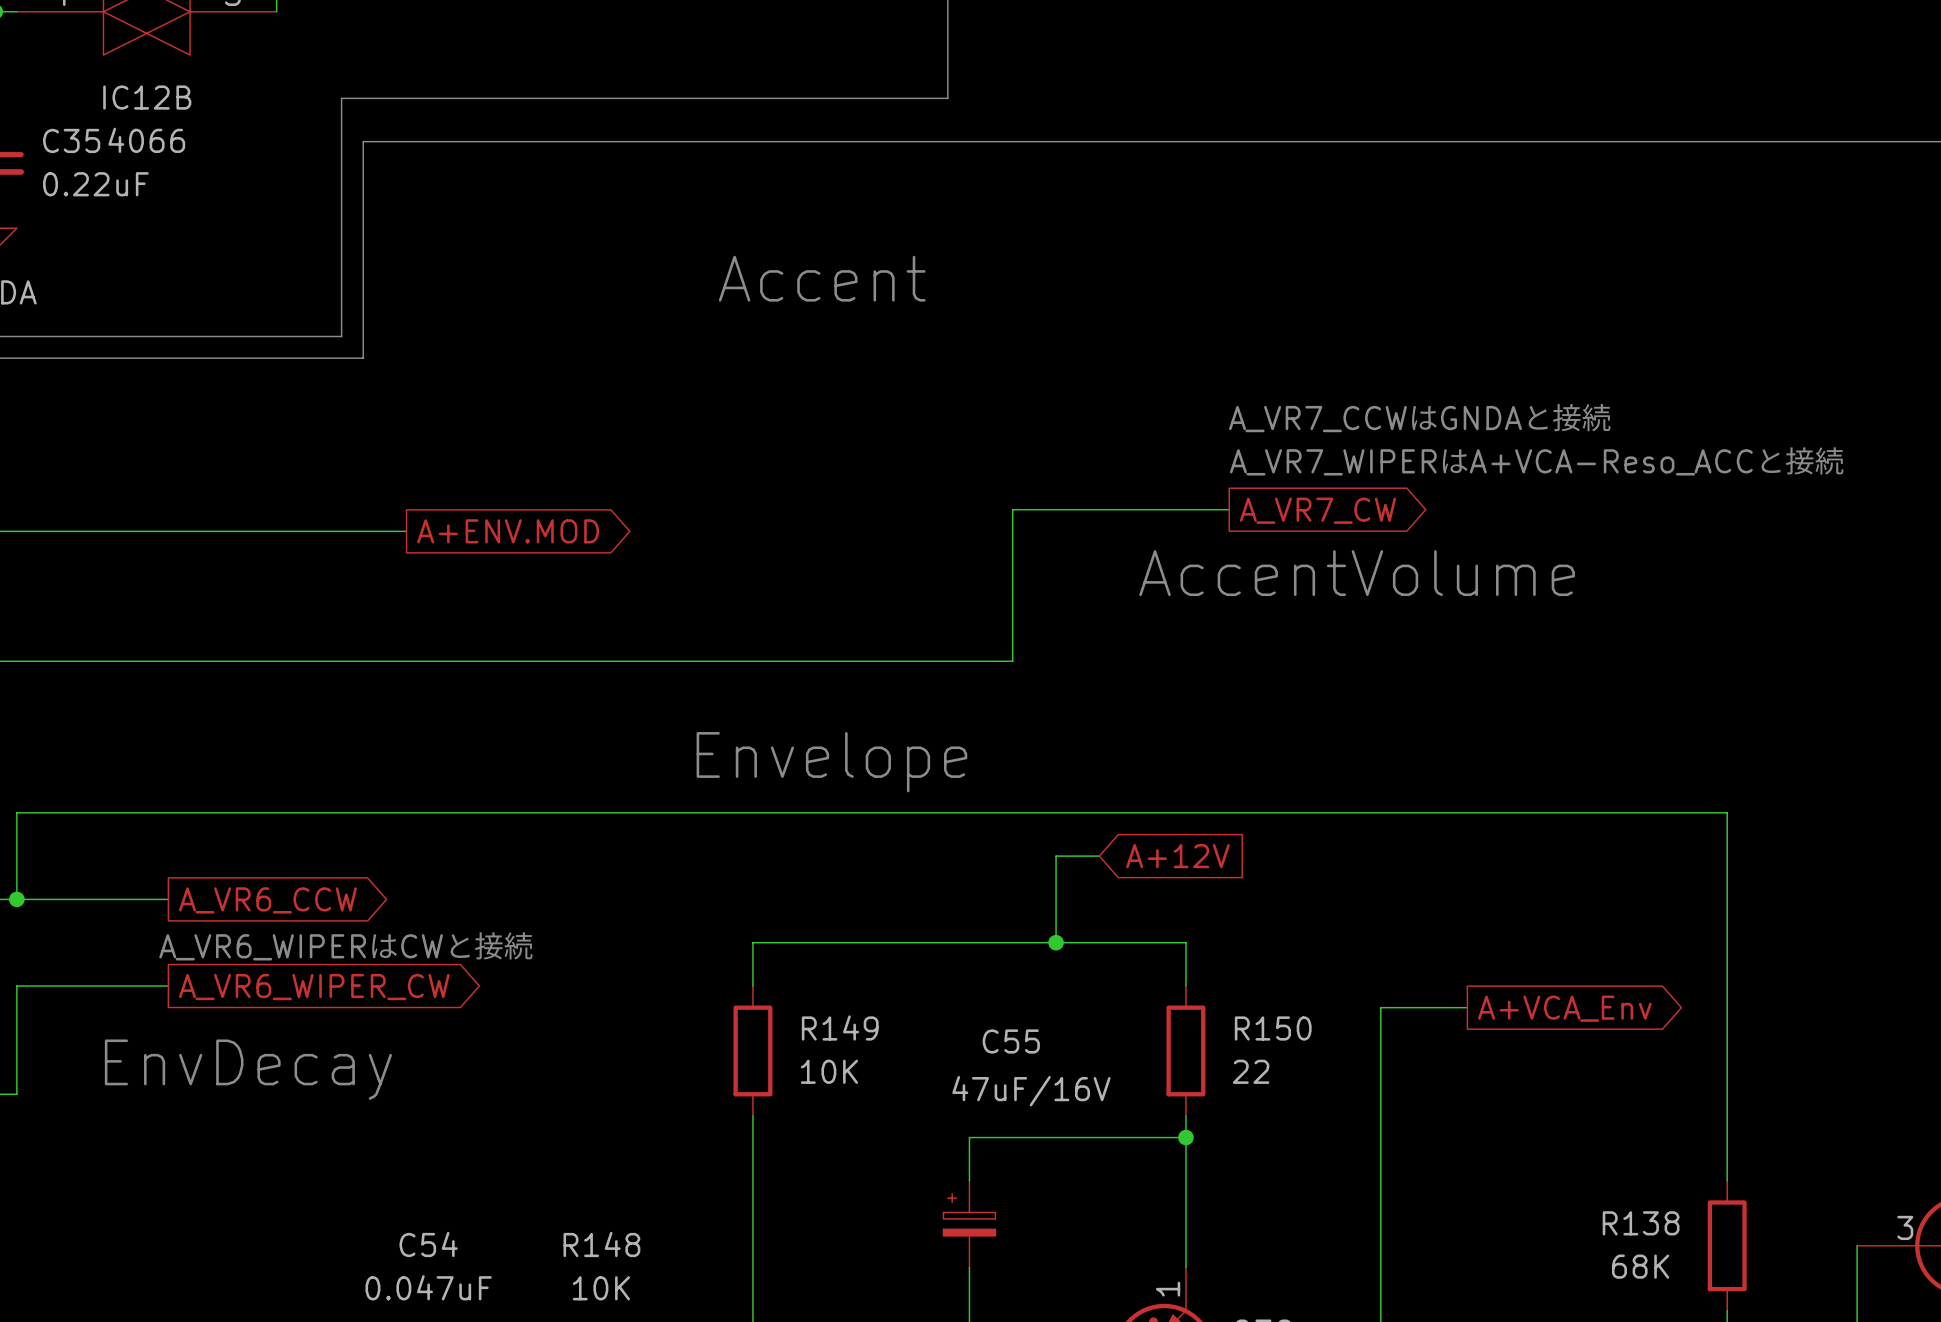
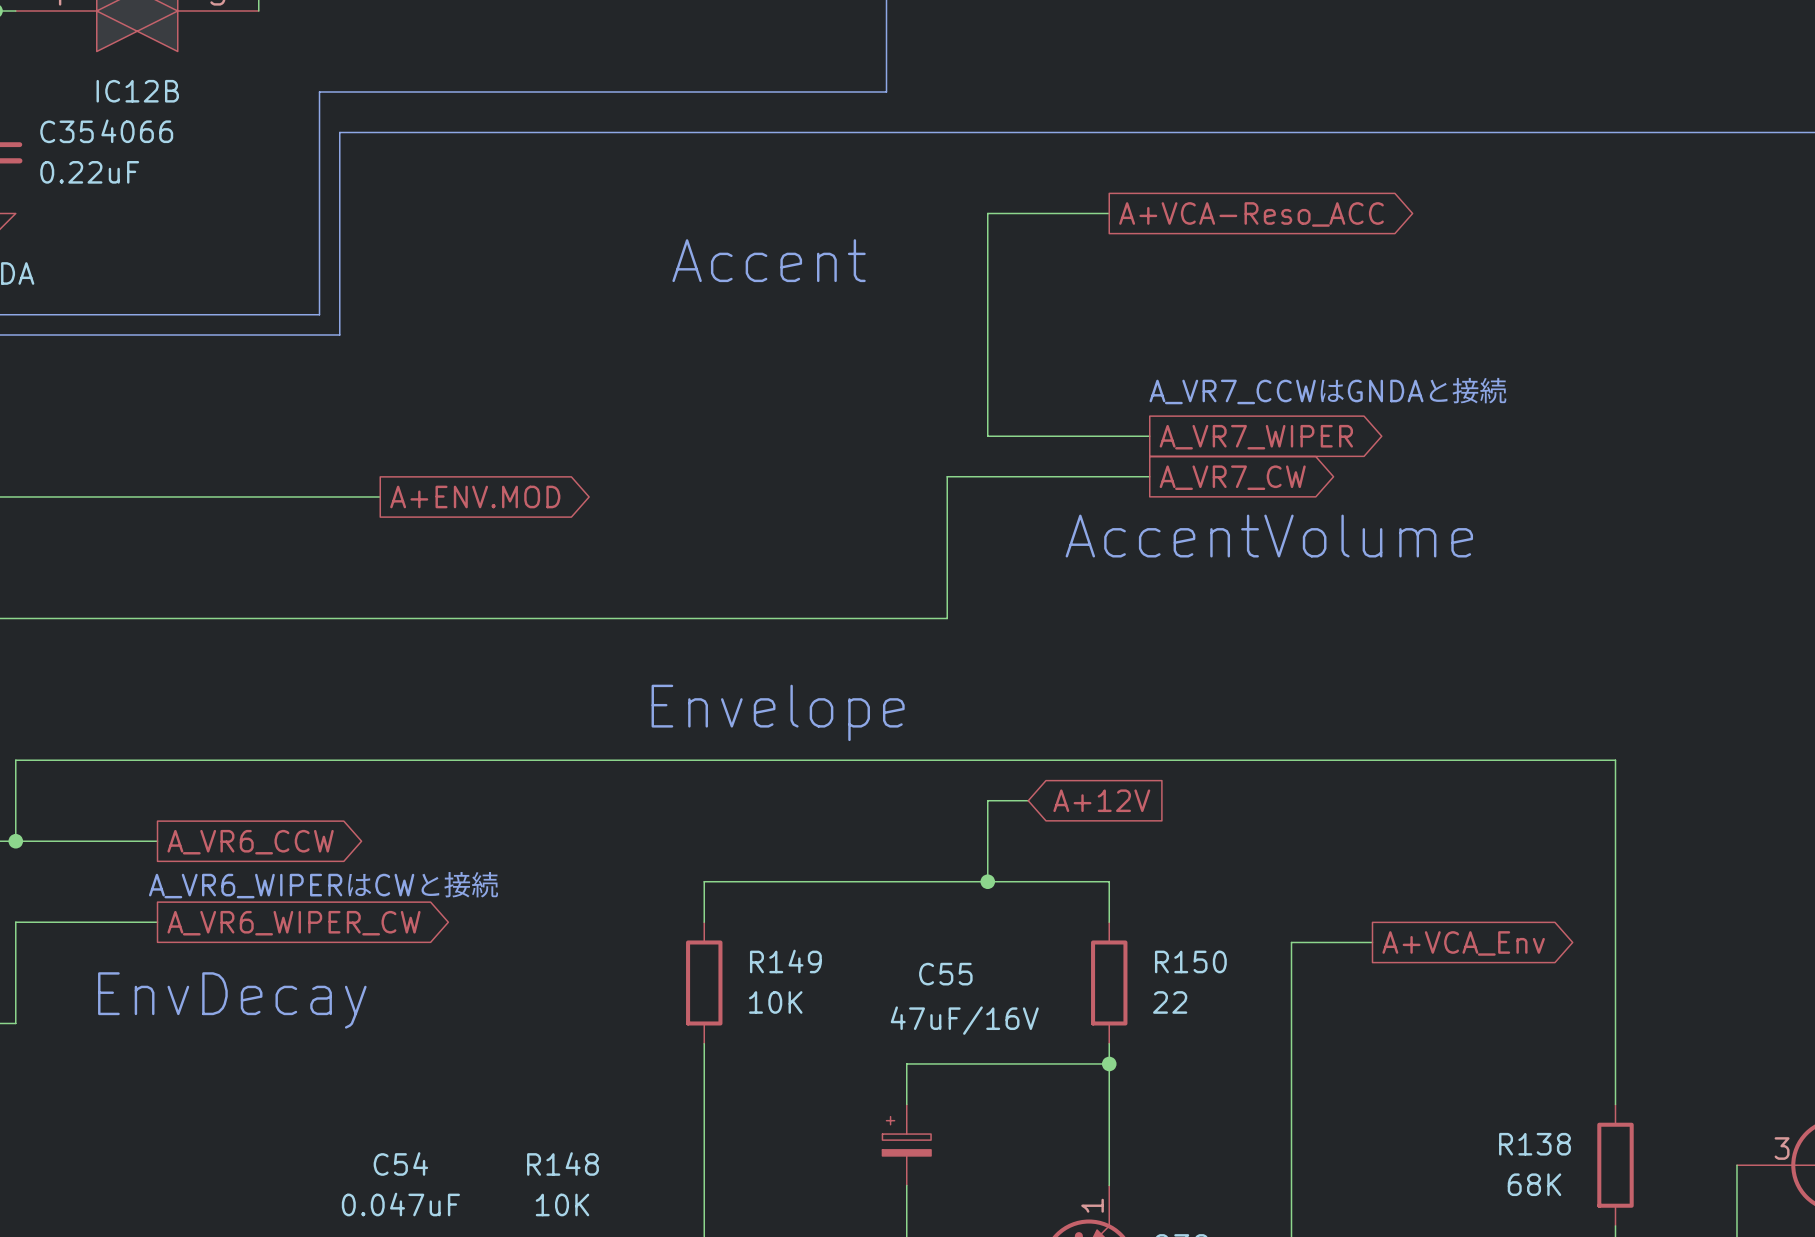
wire: none -> (1109, 213) (987, 213) (987, 436) (1149, 436)
global label: none -> A+VCA-Reso_ACC (1251, 214)
text: A_VR7_WIPERはA+VCA-Reso_ACCと接続 (1537, 460) -> none
global label: none -> A_VR7_WIPER (1256, 437)

